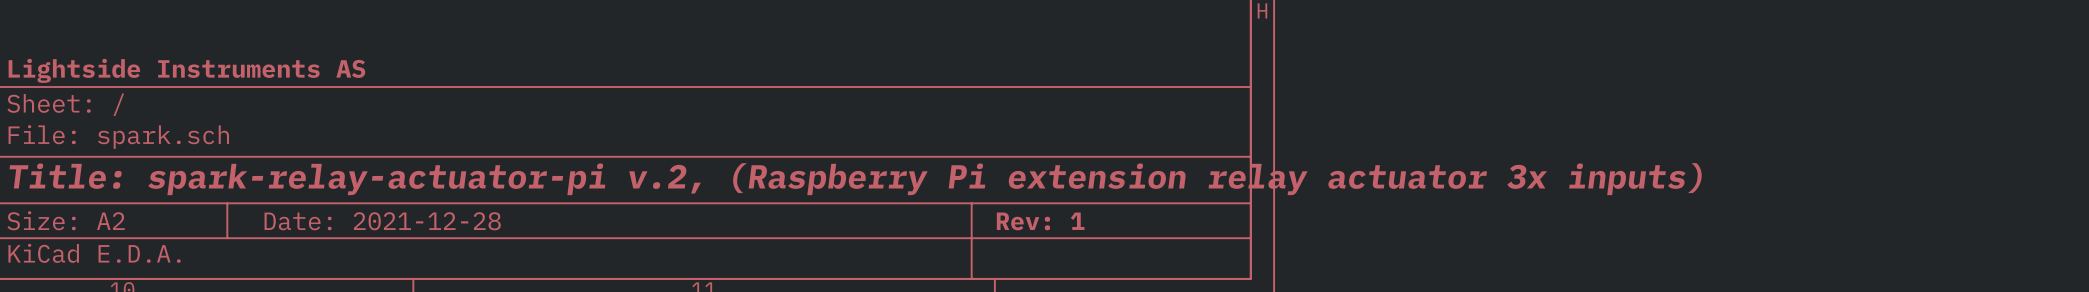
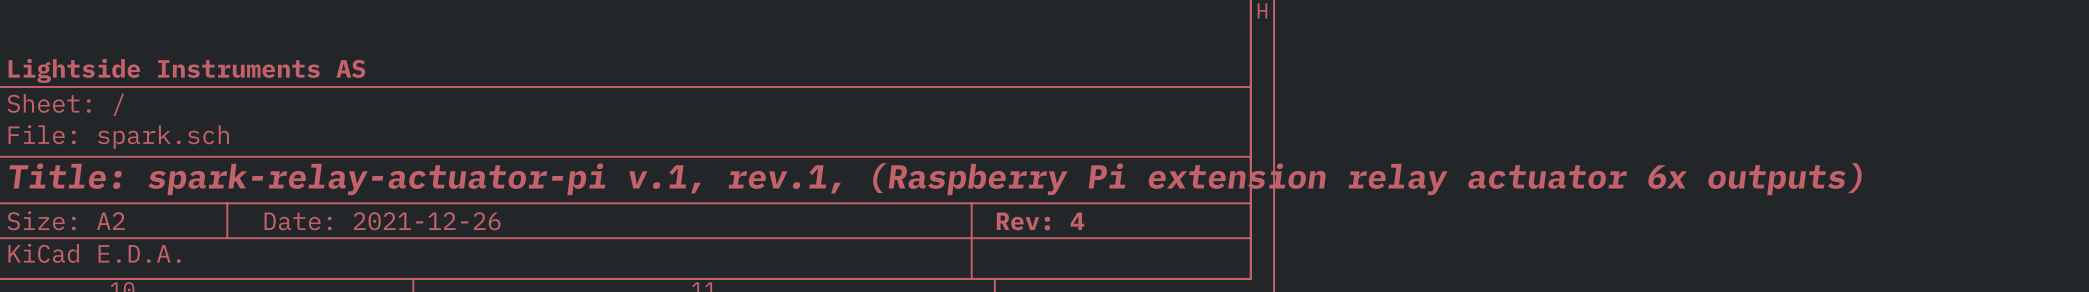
title block: Title: spark-relay-actuator-pi v.2, (Raspberry Pi extension relay actuator 3x inputs) (855, 179) -> Title: spark-relay-actuator-pi v.1, rev.1, (Raspberry Pi extension relay actuator 6x outputs) (935, 179)
title block: Date: 2021-12-28 (382, 221) -> Date: 2021-12-26 (382, 221)
title block: Rev: 1 (1040, 221) -> Rev: 4 (1040, 221)

